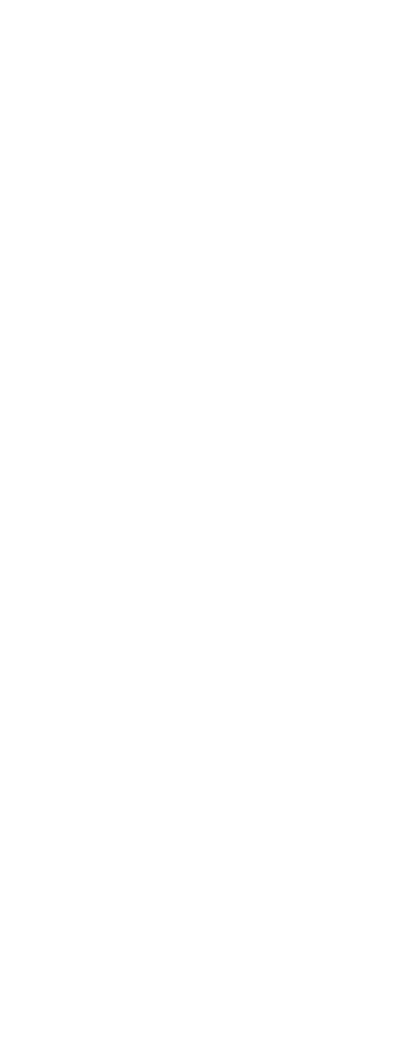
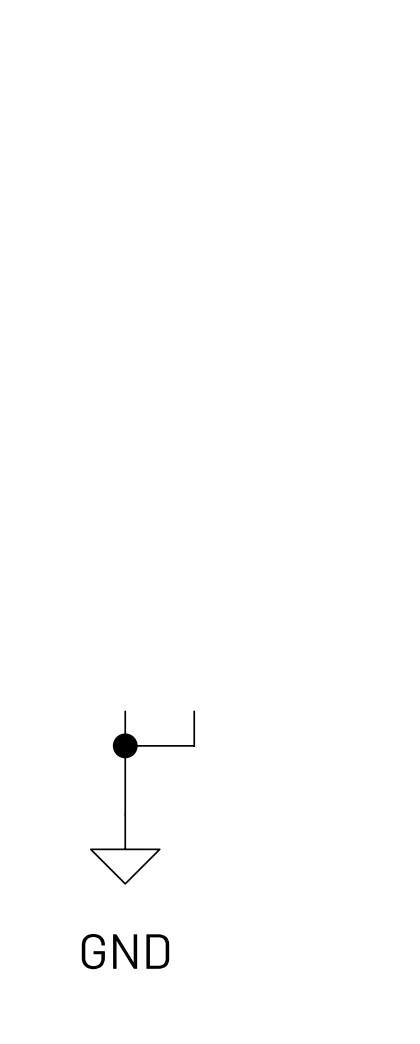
wire: none -> (125, 711) (125, 814)
wire: none -> (194, 711) (194, 745) (125, 745)
junction: none -> (125, 745)
power symbol: none -> GND (125, 849)

